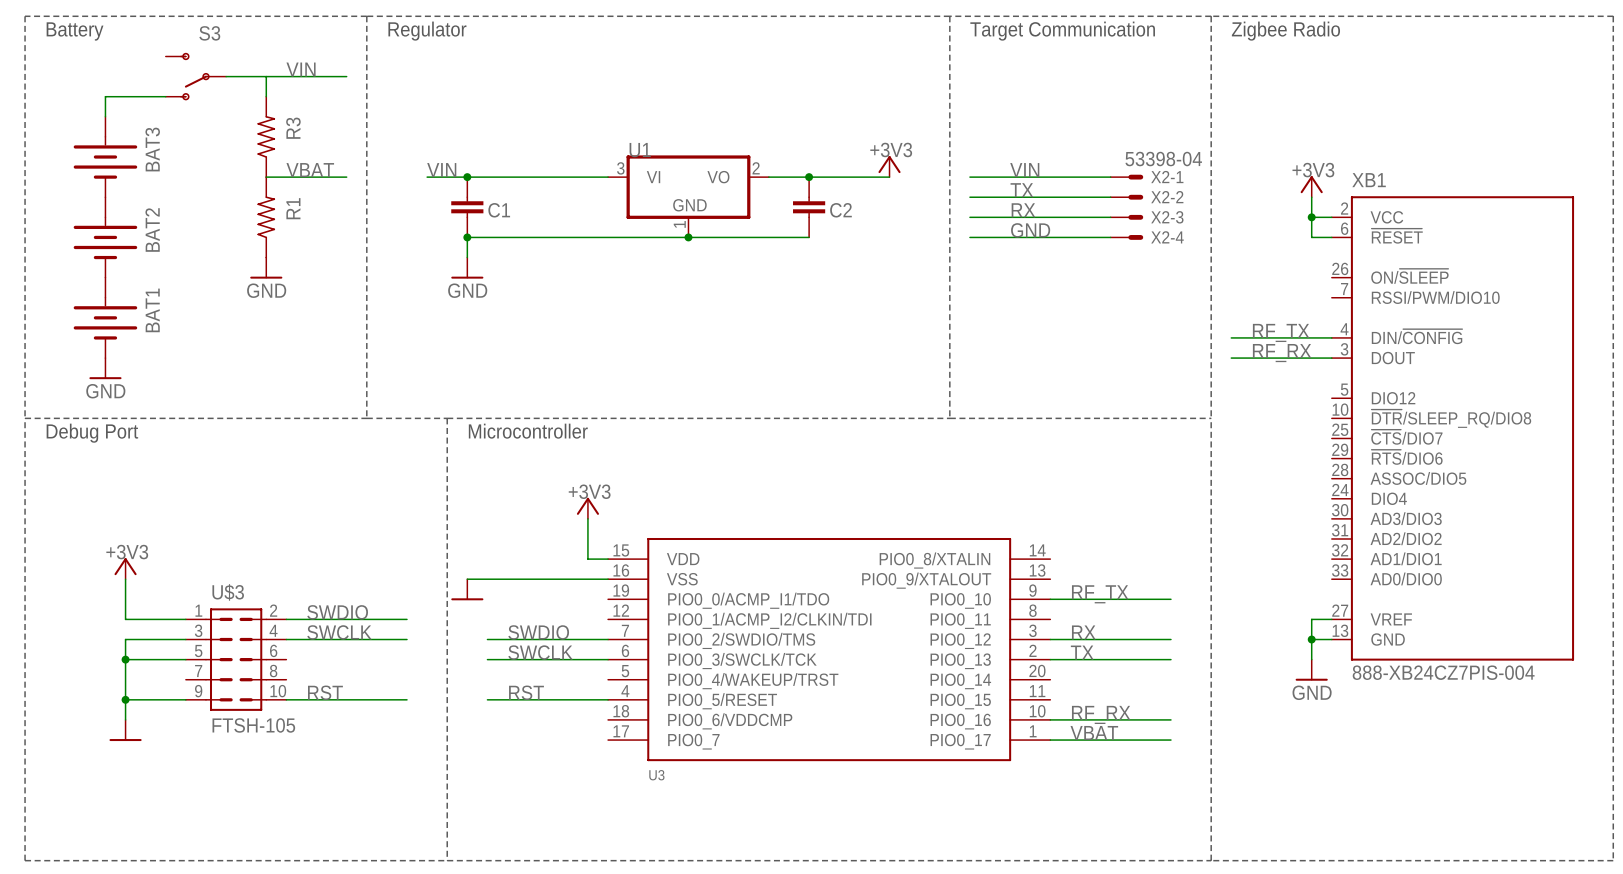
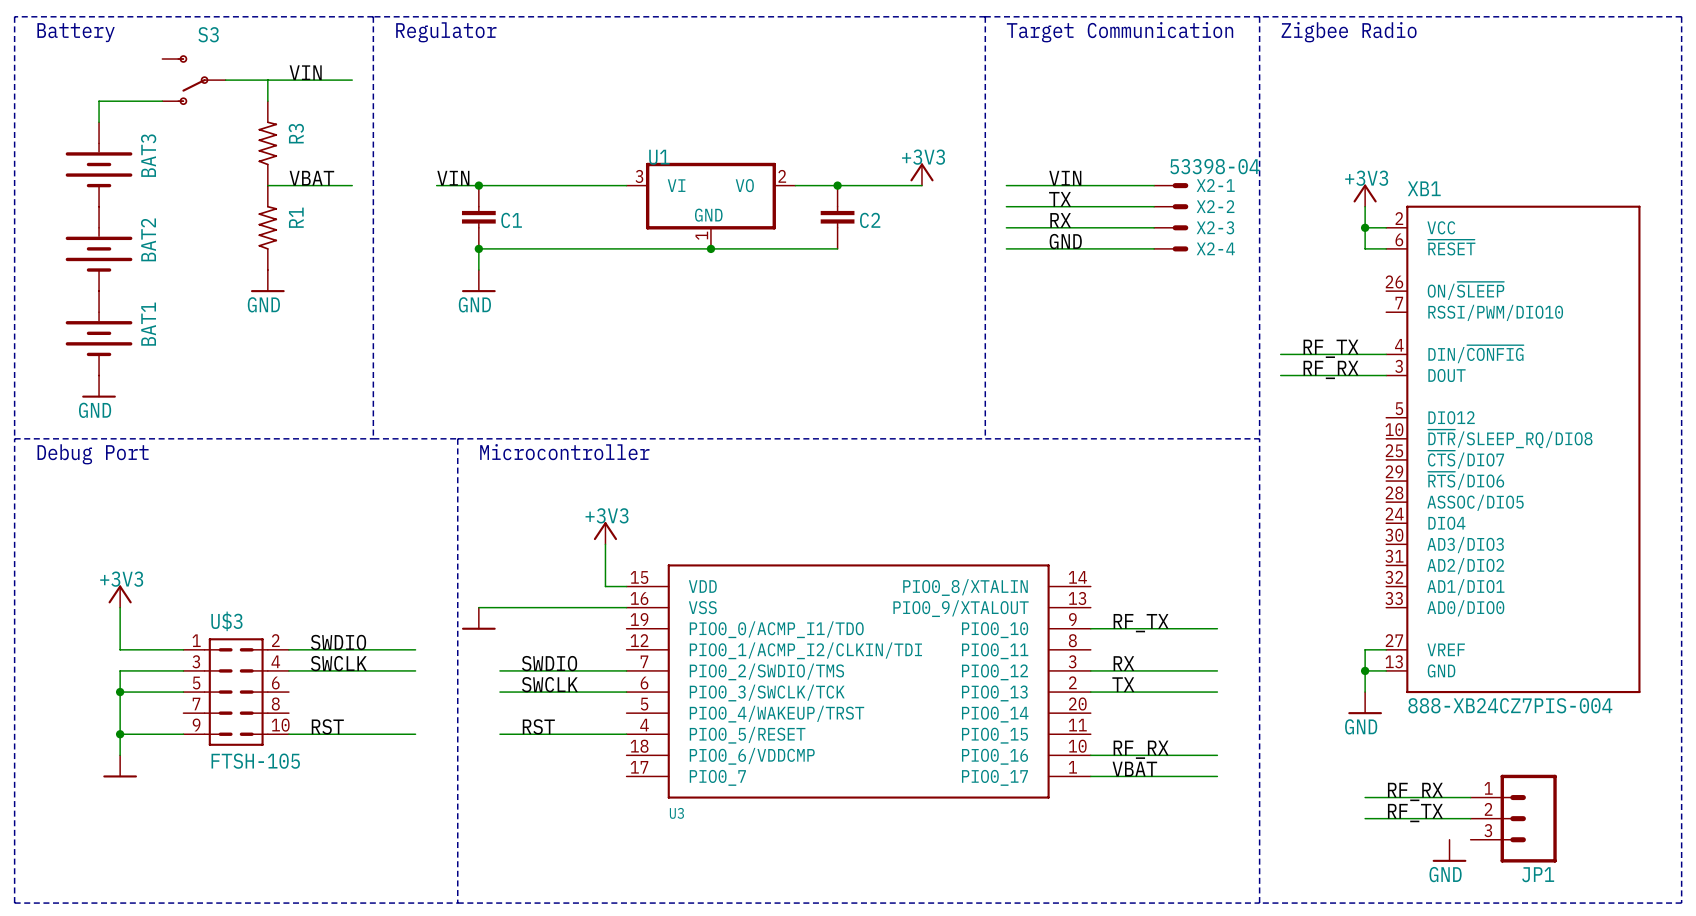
label: none -> RF_RX (1415, 791)
wire: none -> (1365, 797) (1470, 797)
label: none -> RF_TX (1415, 813)
wire: none -> (1365, 818) (1470, 818)
JP1: none -> (1513, 818)
power symbol: none -> GND (1449, 850)

